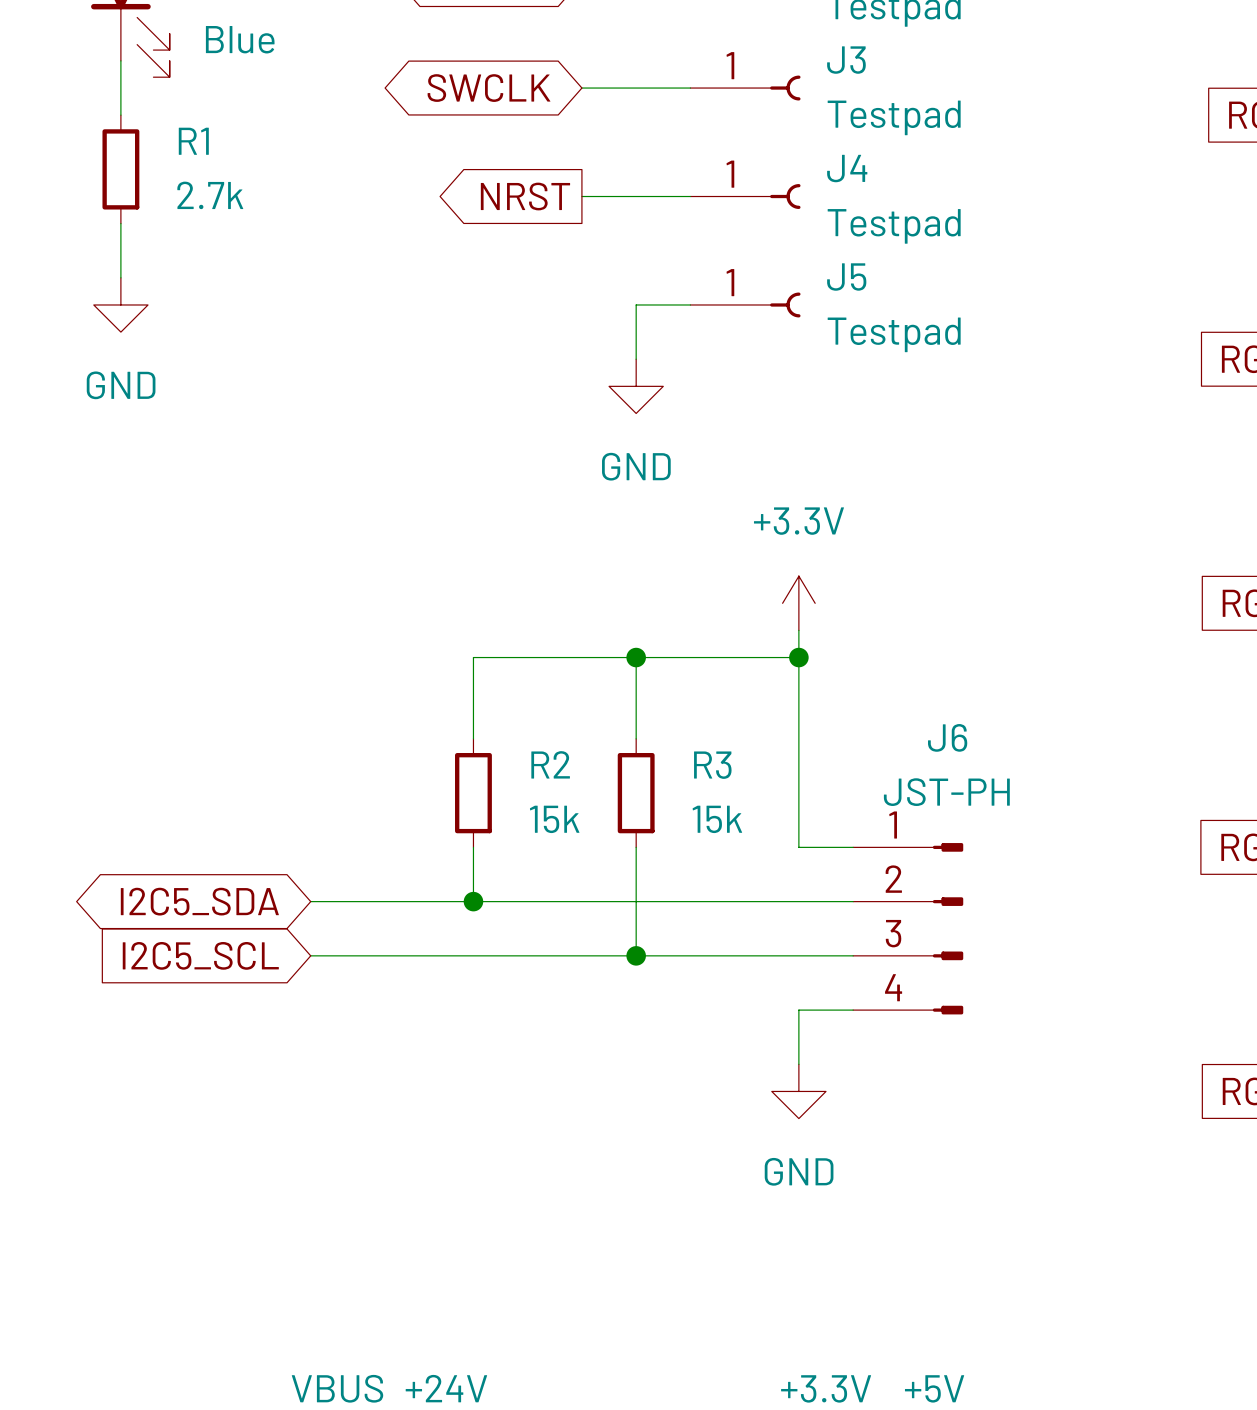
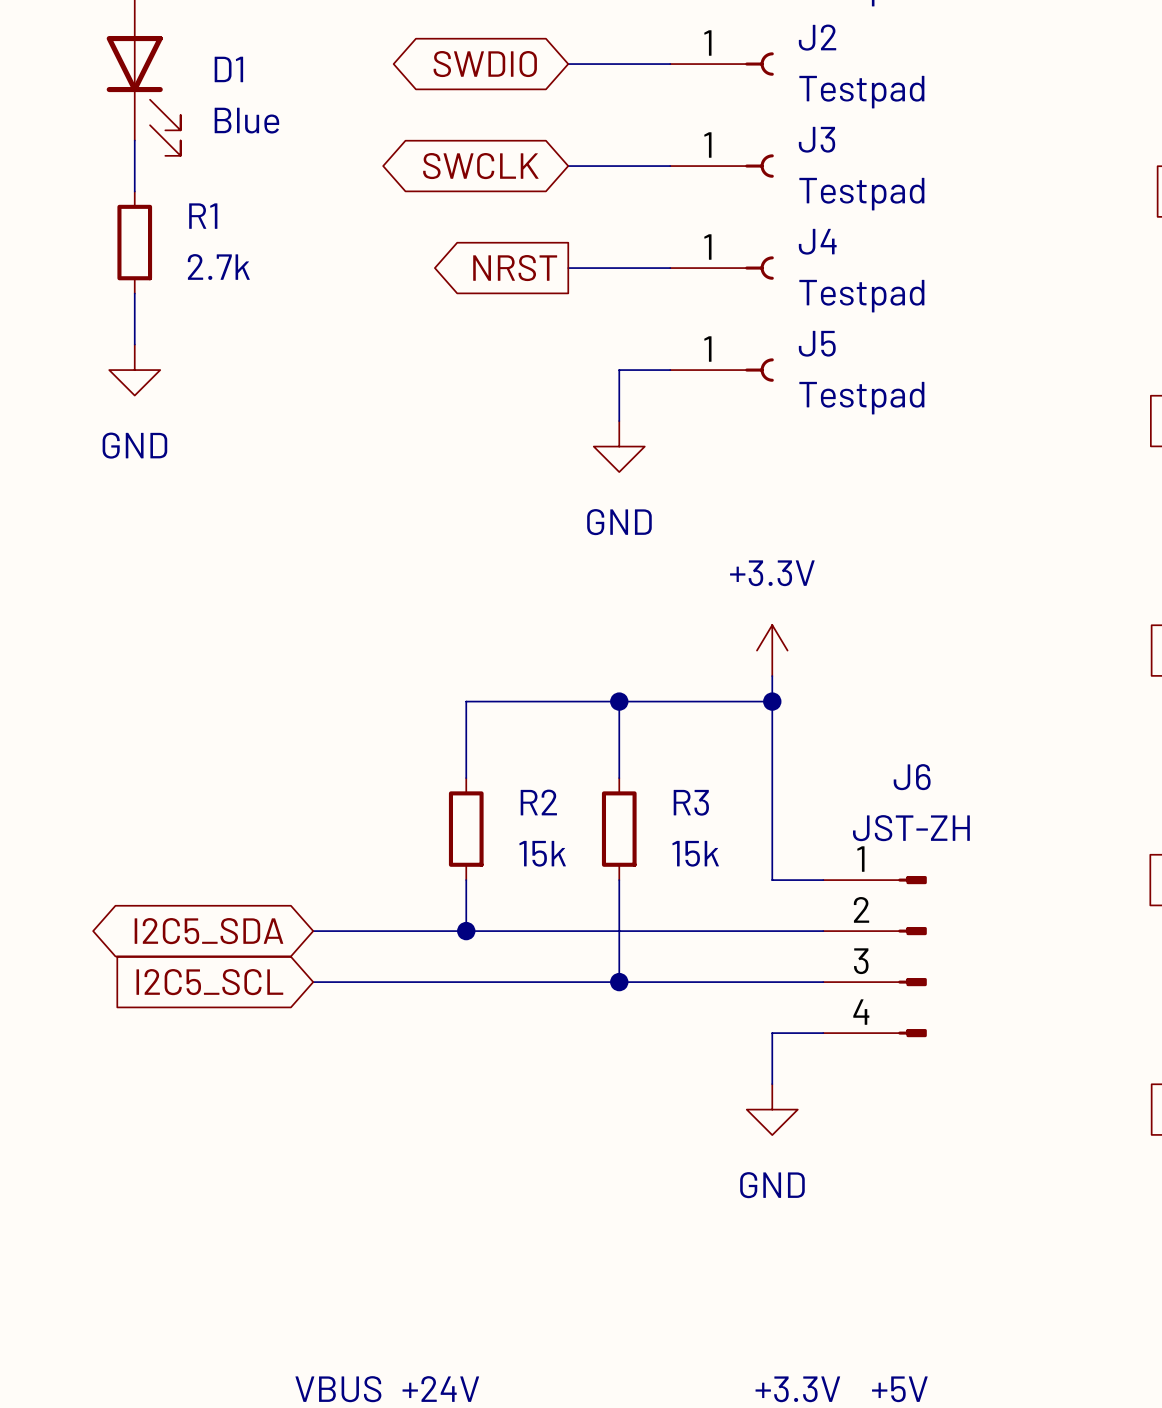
J6 value: JST-PH (946, 792) -> JST-ZH (911, 828)

